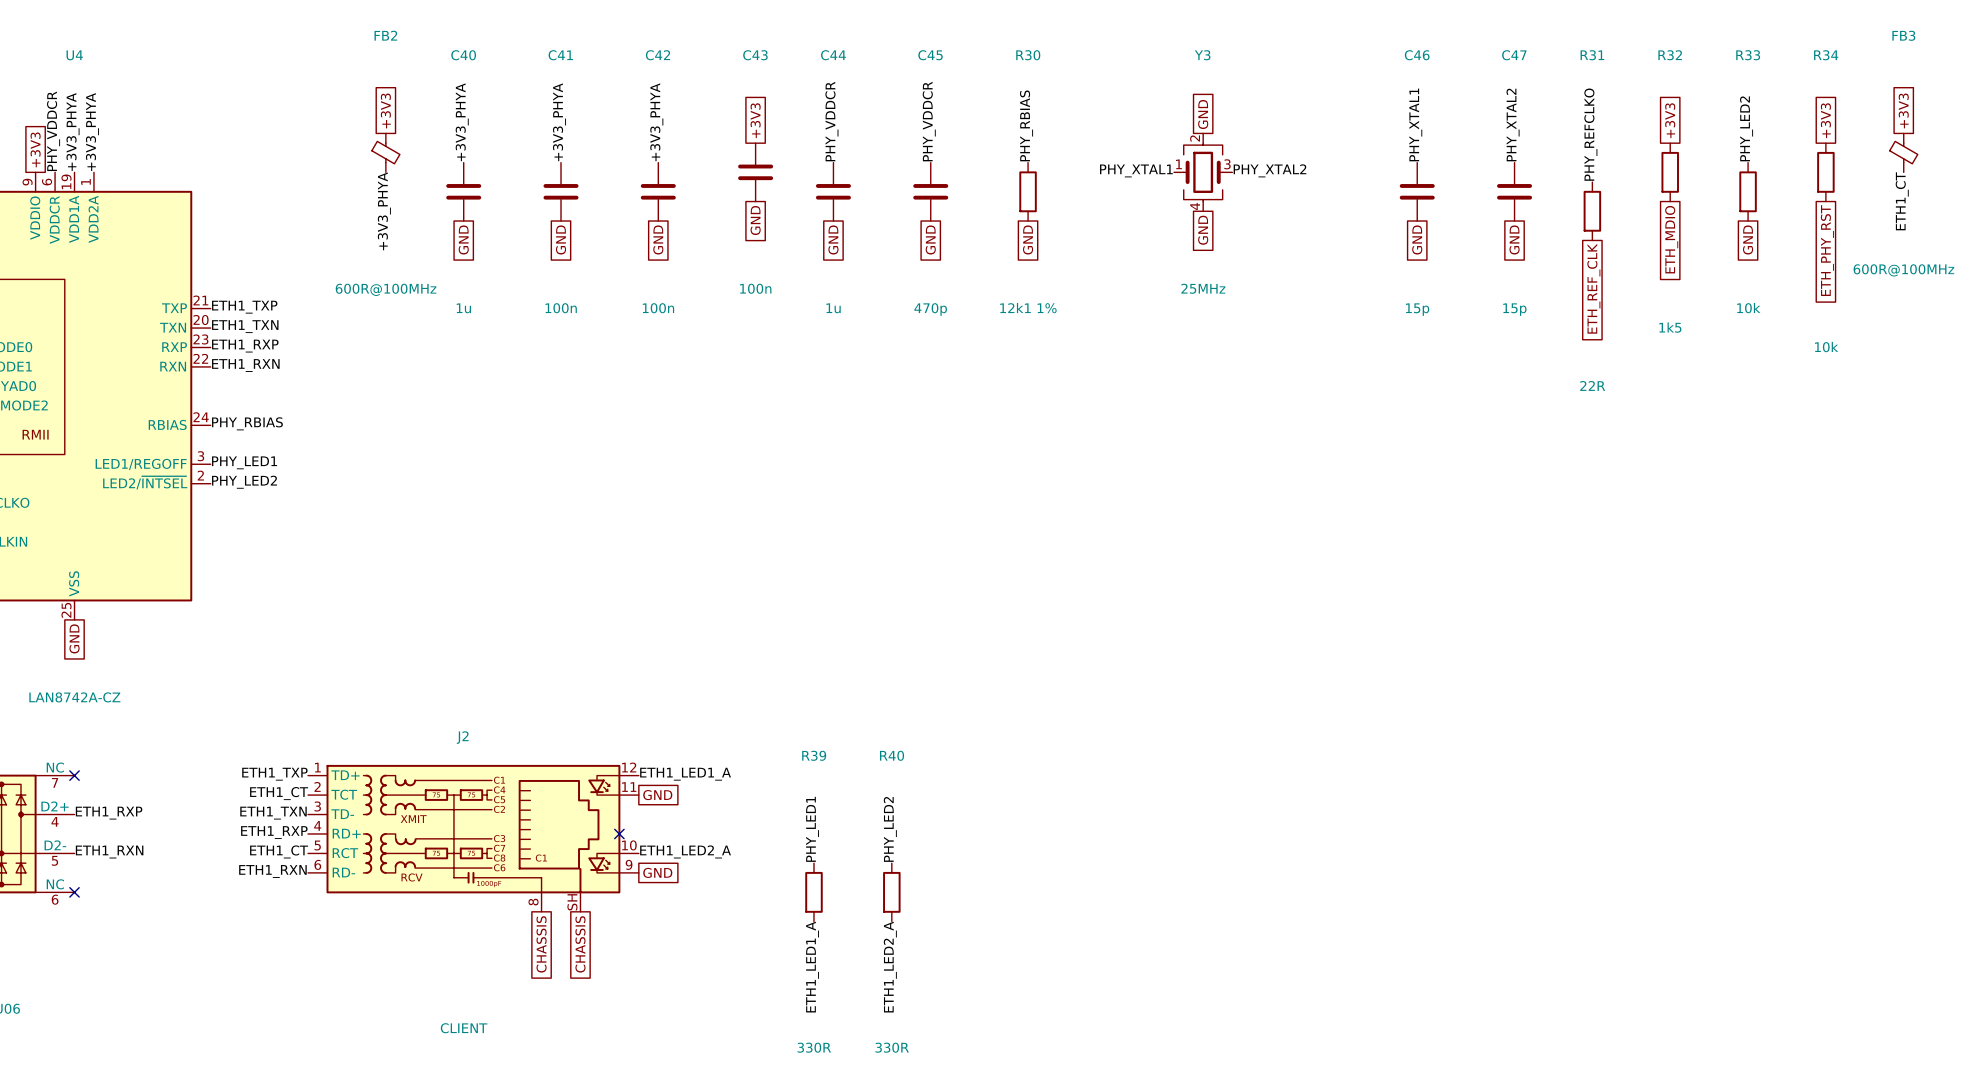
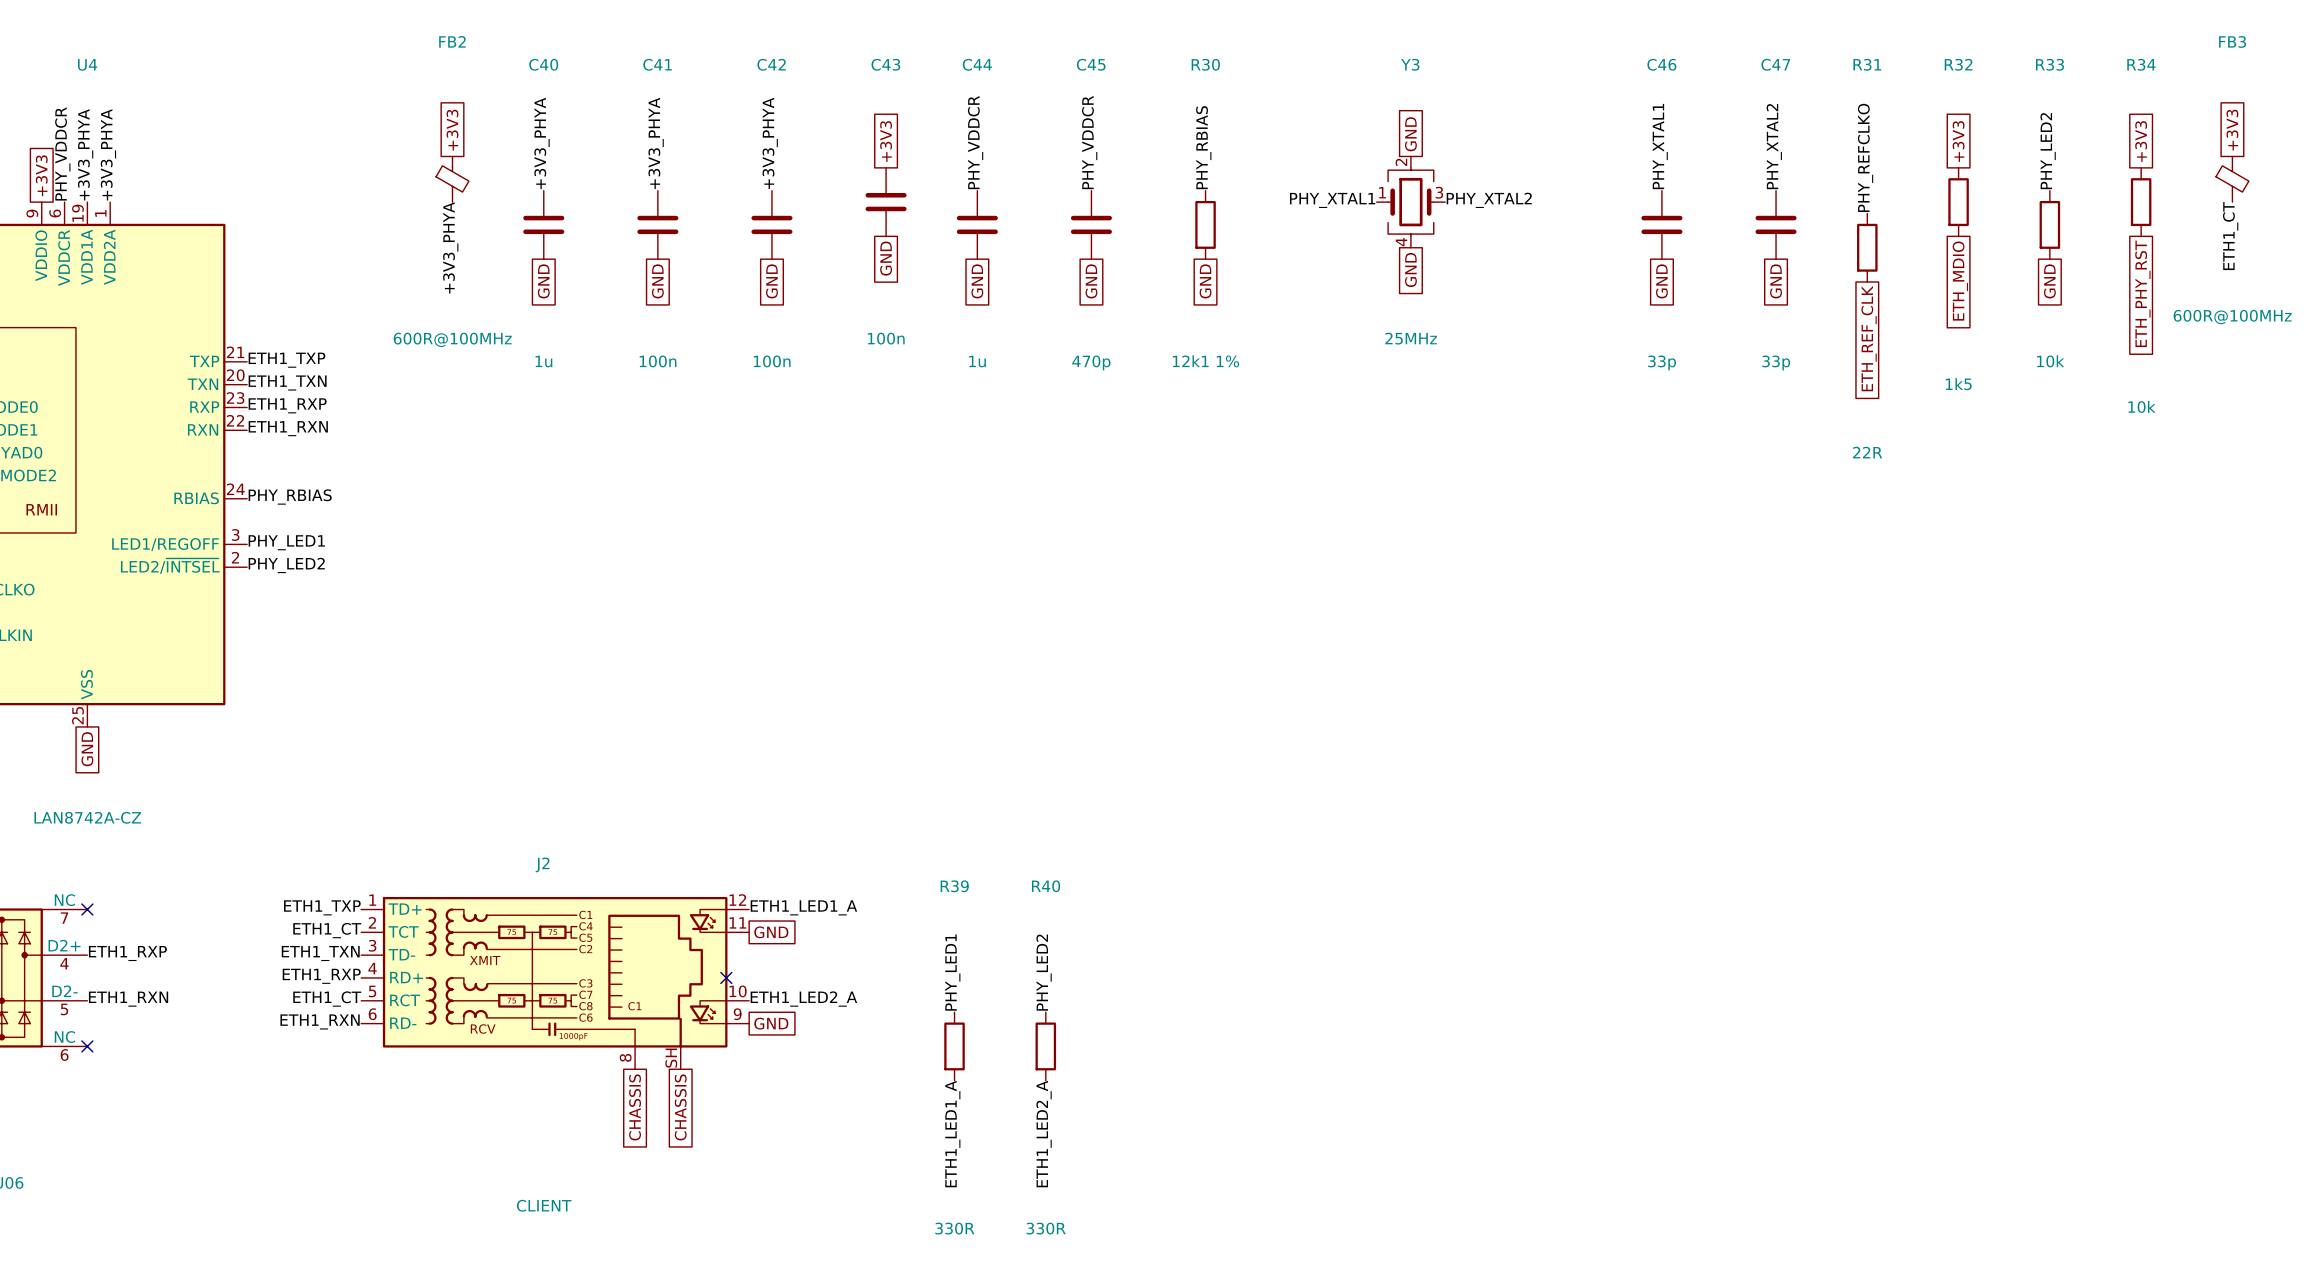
C46 value: 15p (1417, 309) -> 33p (1662, 362)
C47 value: 15p (1514, 309) -> 33p (1776, 362)

